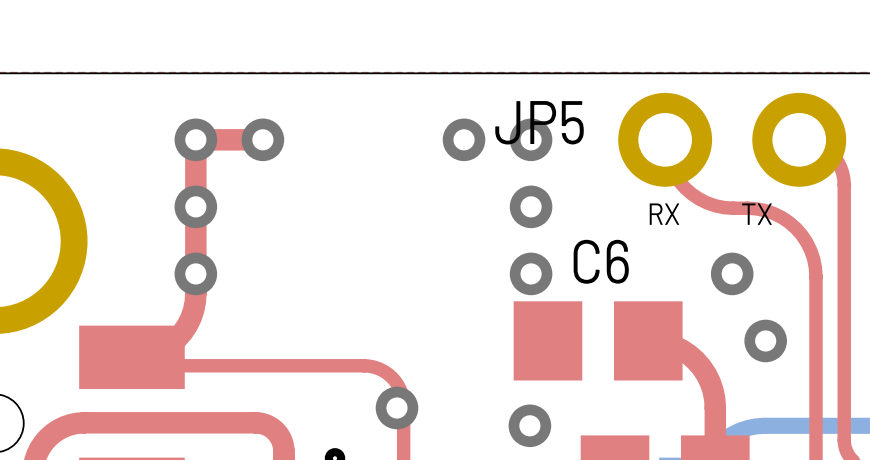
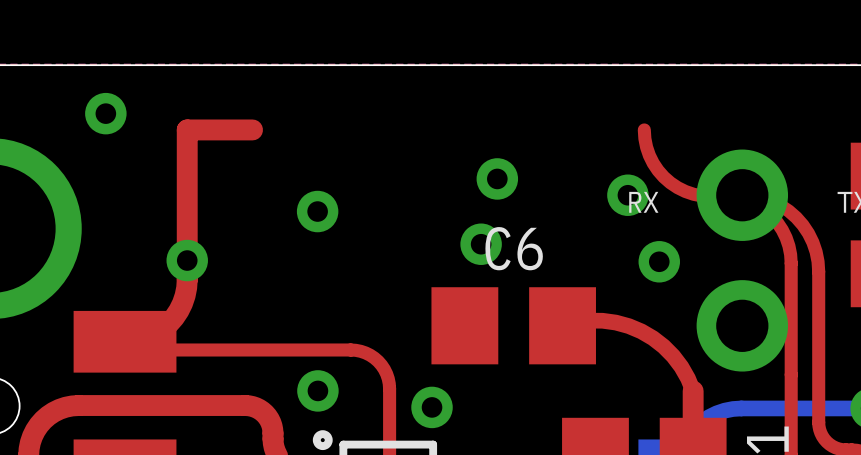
via: none -> (105, 113)
via: (195, 139) -> none
via: (262, 139) -> none
via: (464, 139) -> none
via: (531, 139) -> none
part: (665, 139) -> none
top track: (799, 139) (810, 141) (826, 149) (834, 157) (842, 173) (844, 285) -> (742, 195) (771, 201) (796, 217) (812, 242) (818, 271)
JP5: (799, 139) -> none
via: (195, 206) -> none
via position: (531, 206) -> (497, 178)
via: none -> (627, 195)
part: none -> (742, 195)
via: none -> (317, 211)
via position: (531, 273) -> (481, 244)
via position: (732, 273) -> (659, 261)
C6 position: (598, 340) -> (513, 325)
top track: (648, 340) (673, 346) (695, 360) (710, 382) (715, 407) -> (562, 325) (589, 320) (602, 320) (628, 326) (641, 331) (653, 338) (673, 356) (688, 378) (693, 391)
part: none -> (742, 325)
via: (765, 340) -> none
via: none -> (317, 390)
via: (396, 408) -> none
via: none -> (432, 407)
via: (529, 425) -> none

